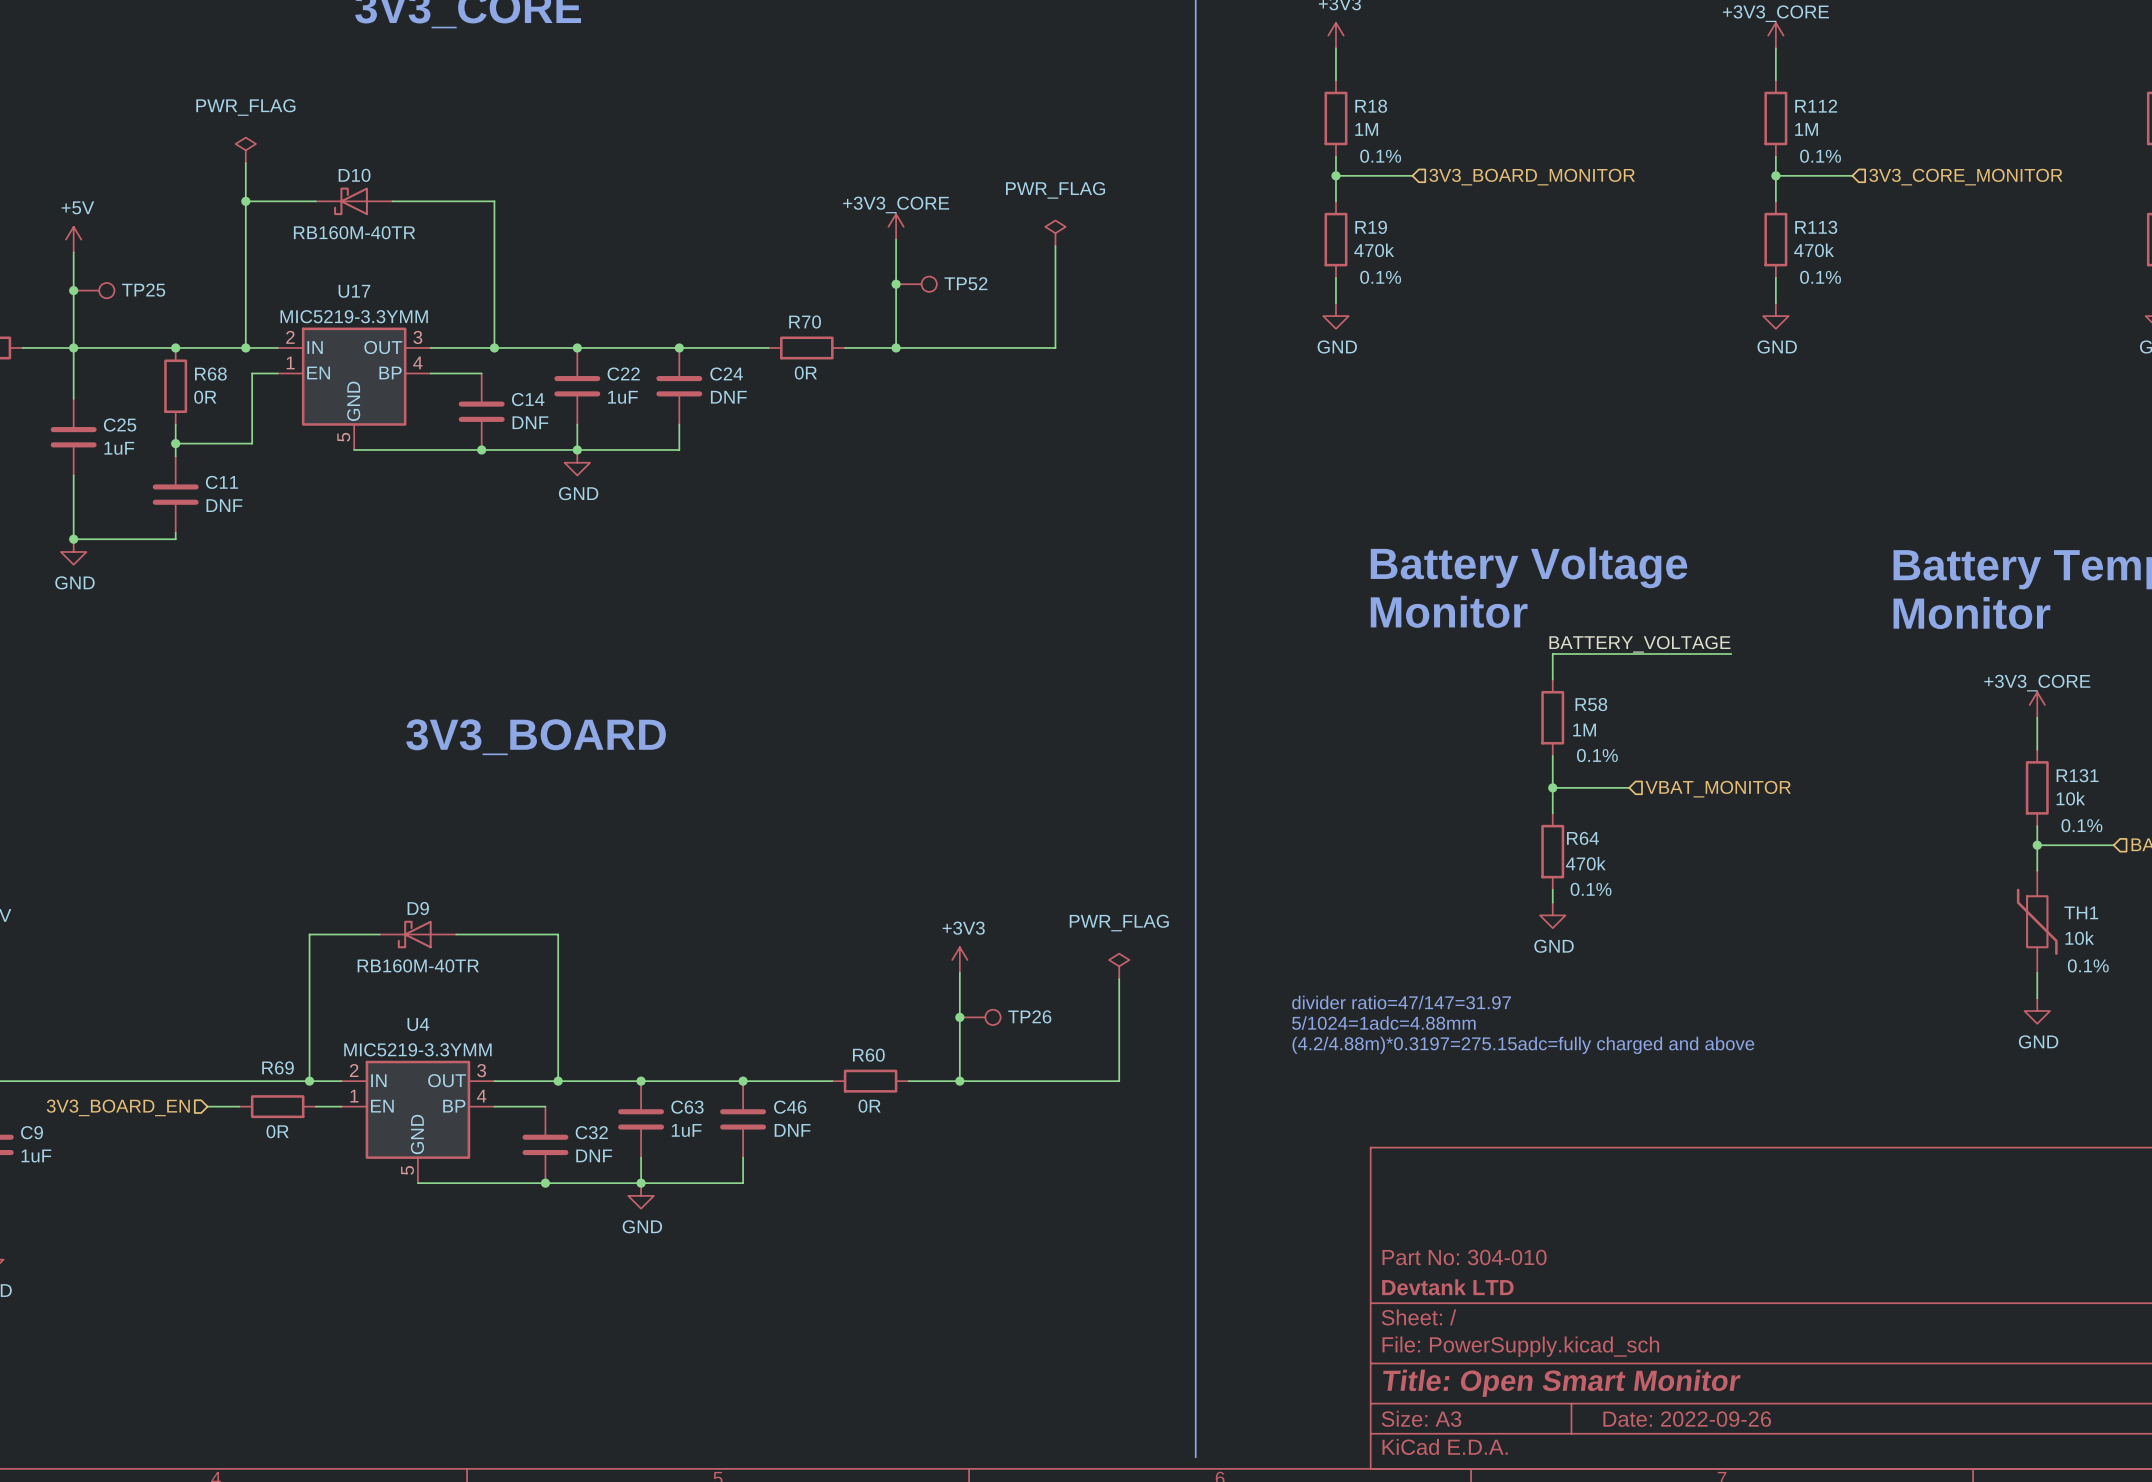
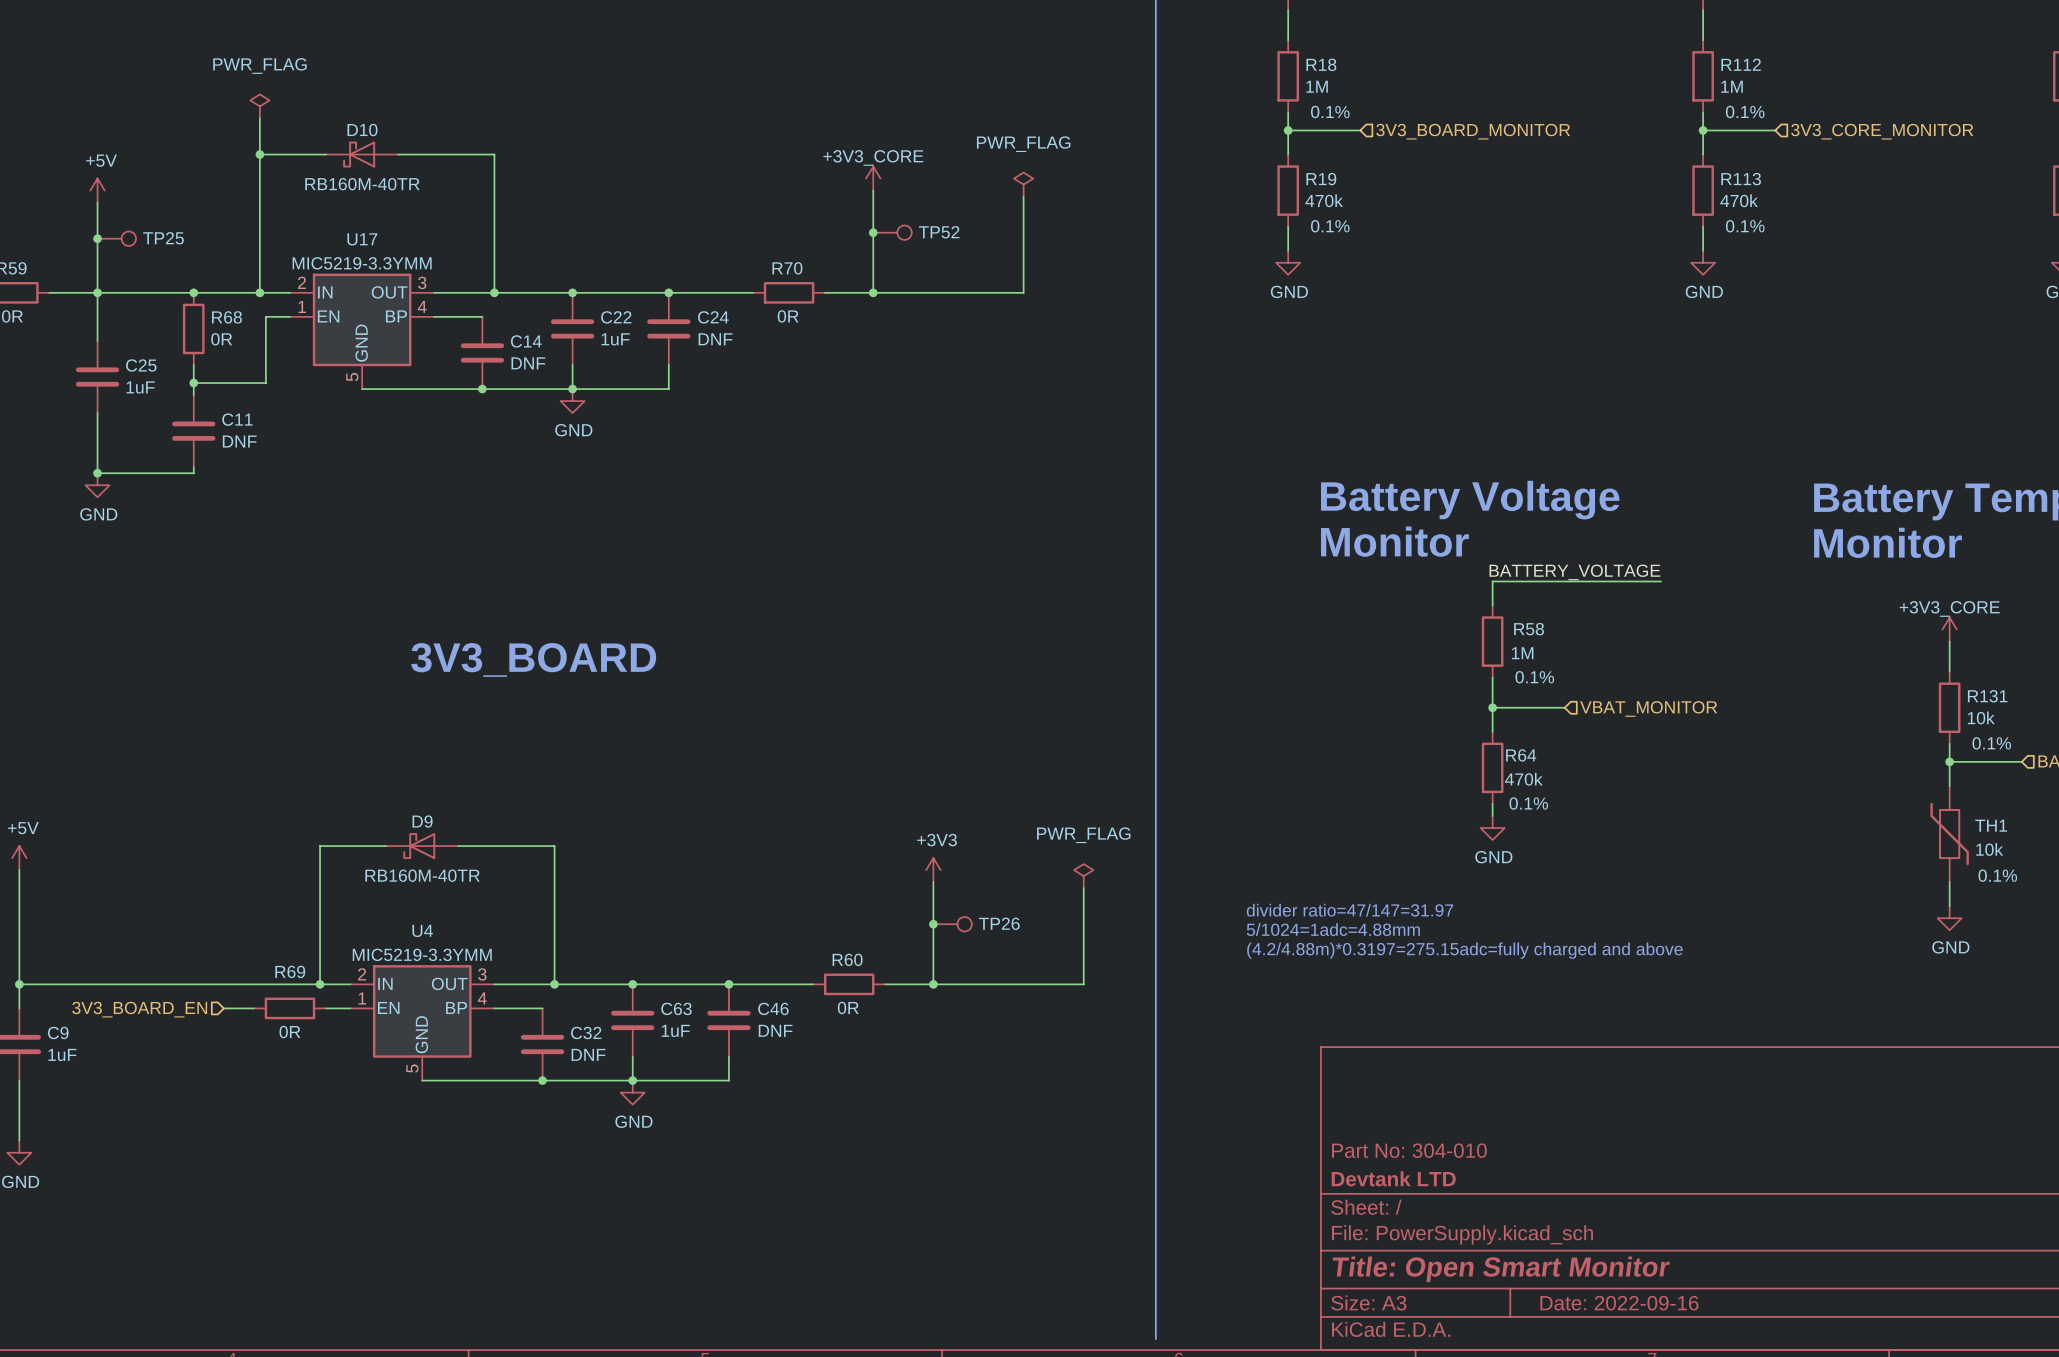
title block: Date: 2022-09-26 (1687, 1419) -> Date: 2022-09-16 (1619, 1303)

